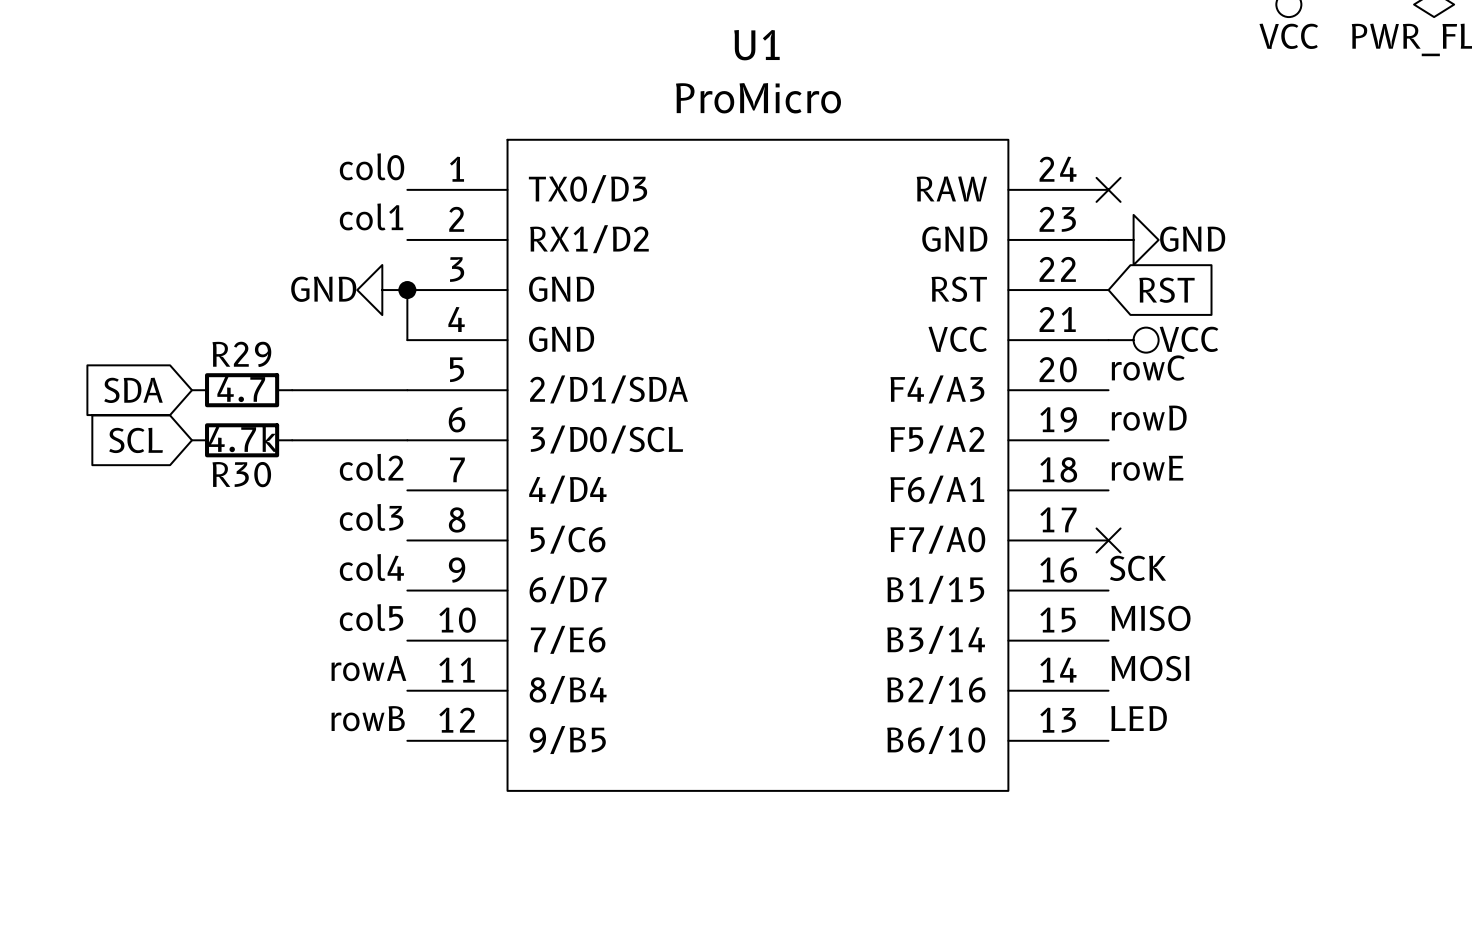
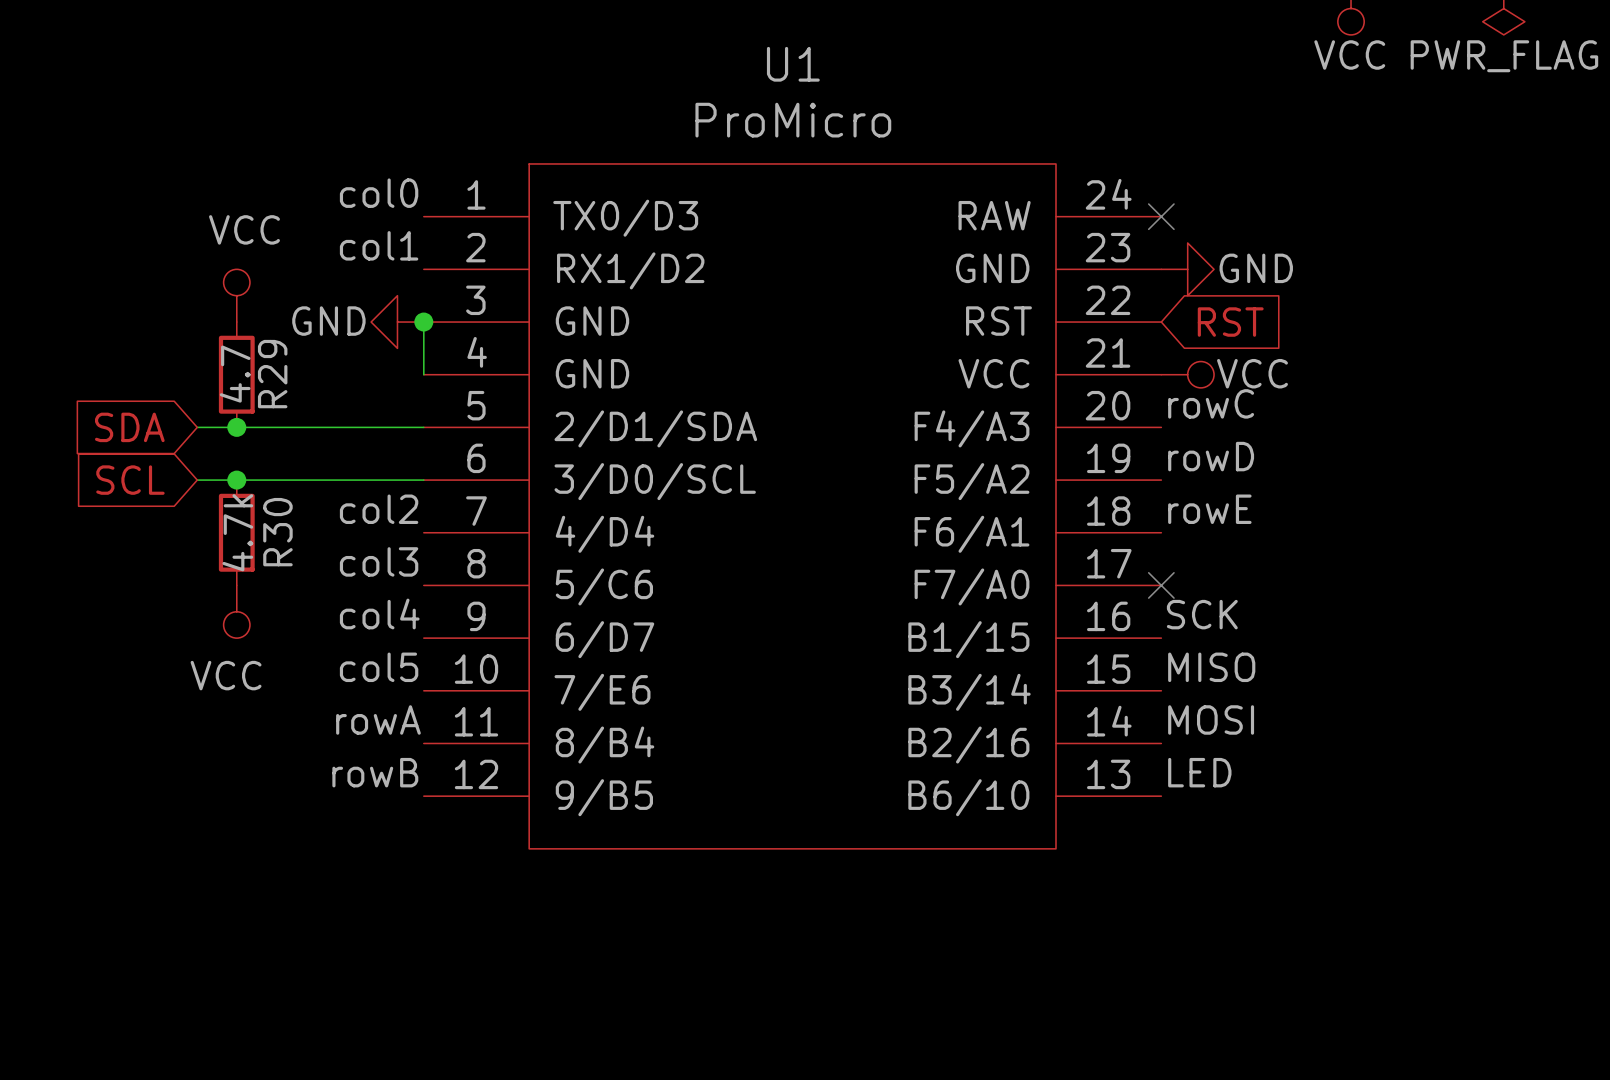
power symbol: none -> VCC (236, 295)
wire: none -> (197, 427) (302, 427)
junction: none -> (236, 427)
R29 rotation: 0° (242, 390) -> 90° clockwise (236, 374)
wire: none -> (197, 480) (302, 480)
junction: none -> (236, 480)
R30 rotation: 0° (242, 440) -> 90° clockwise (236, 532)
R30 name position: R30 (241, 474) -> R30 (277, 532)
power symbol: none -> VCC (236, 611)

